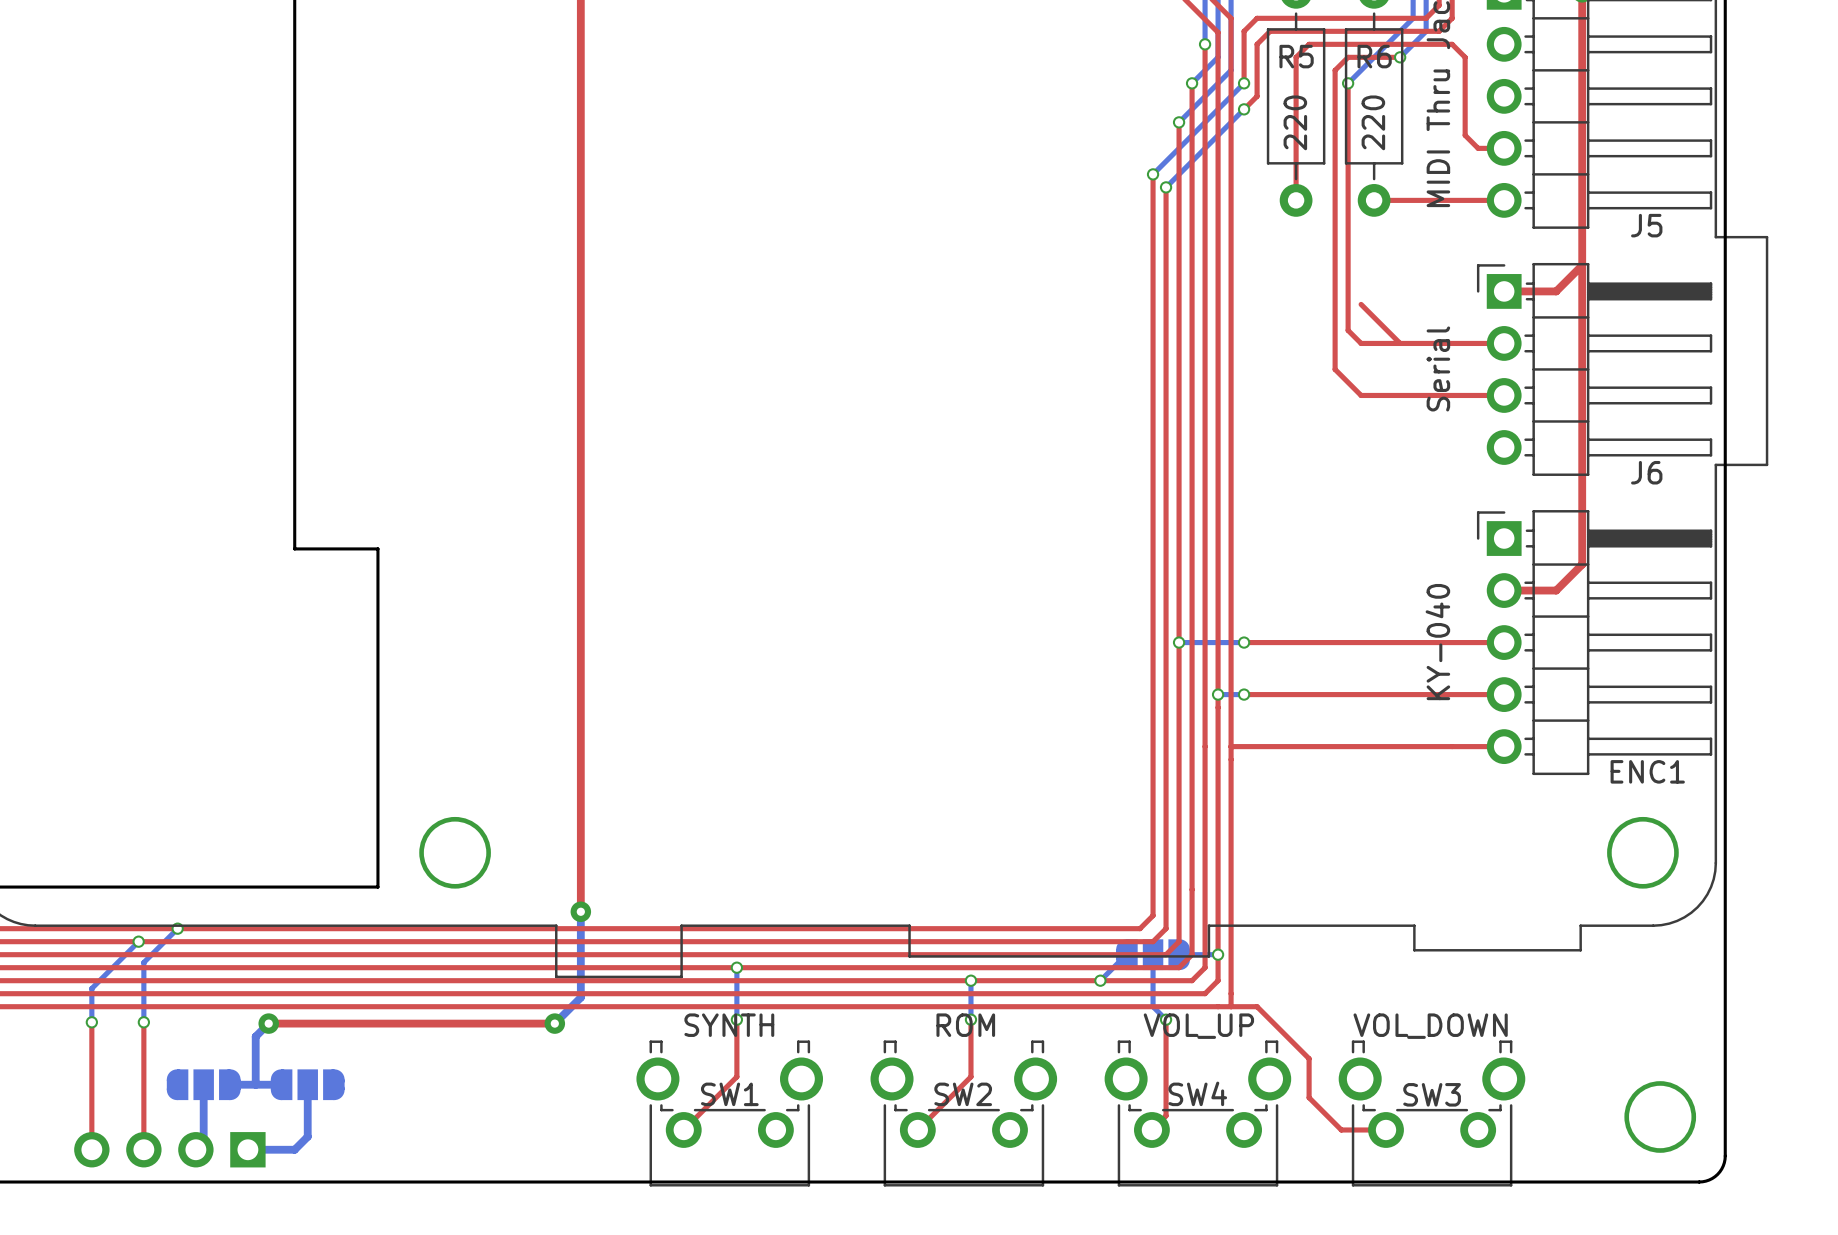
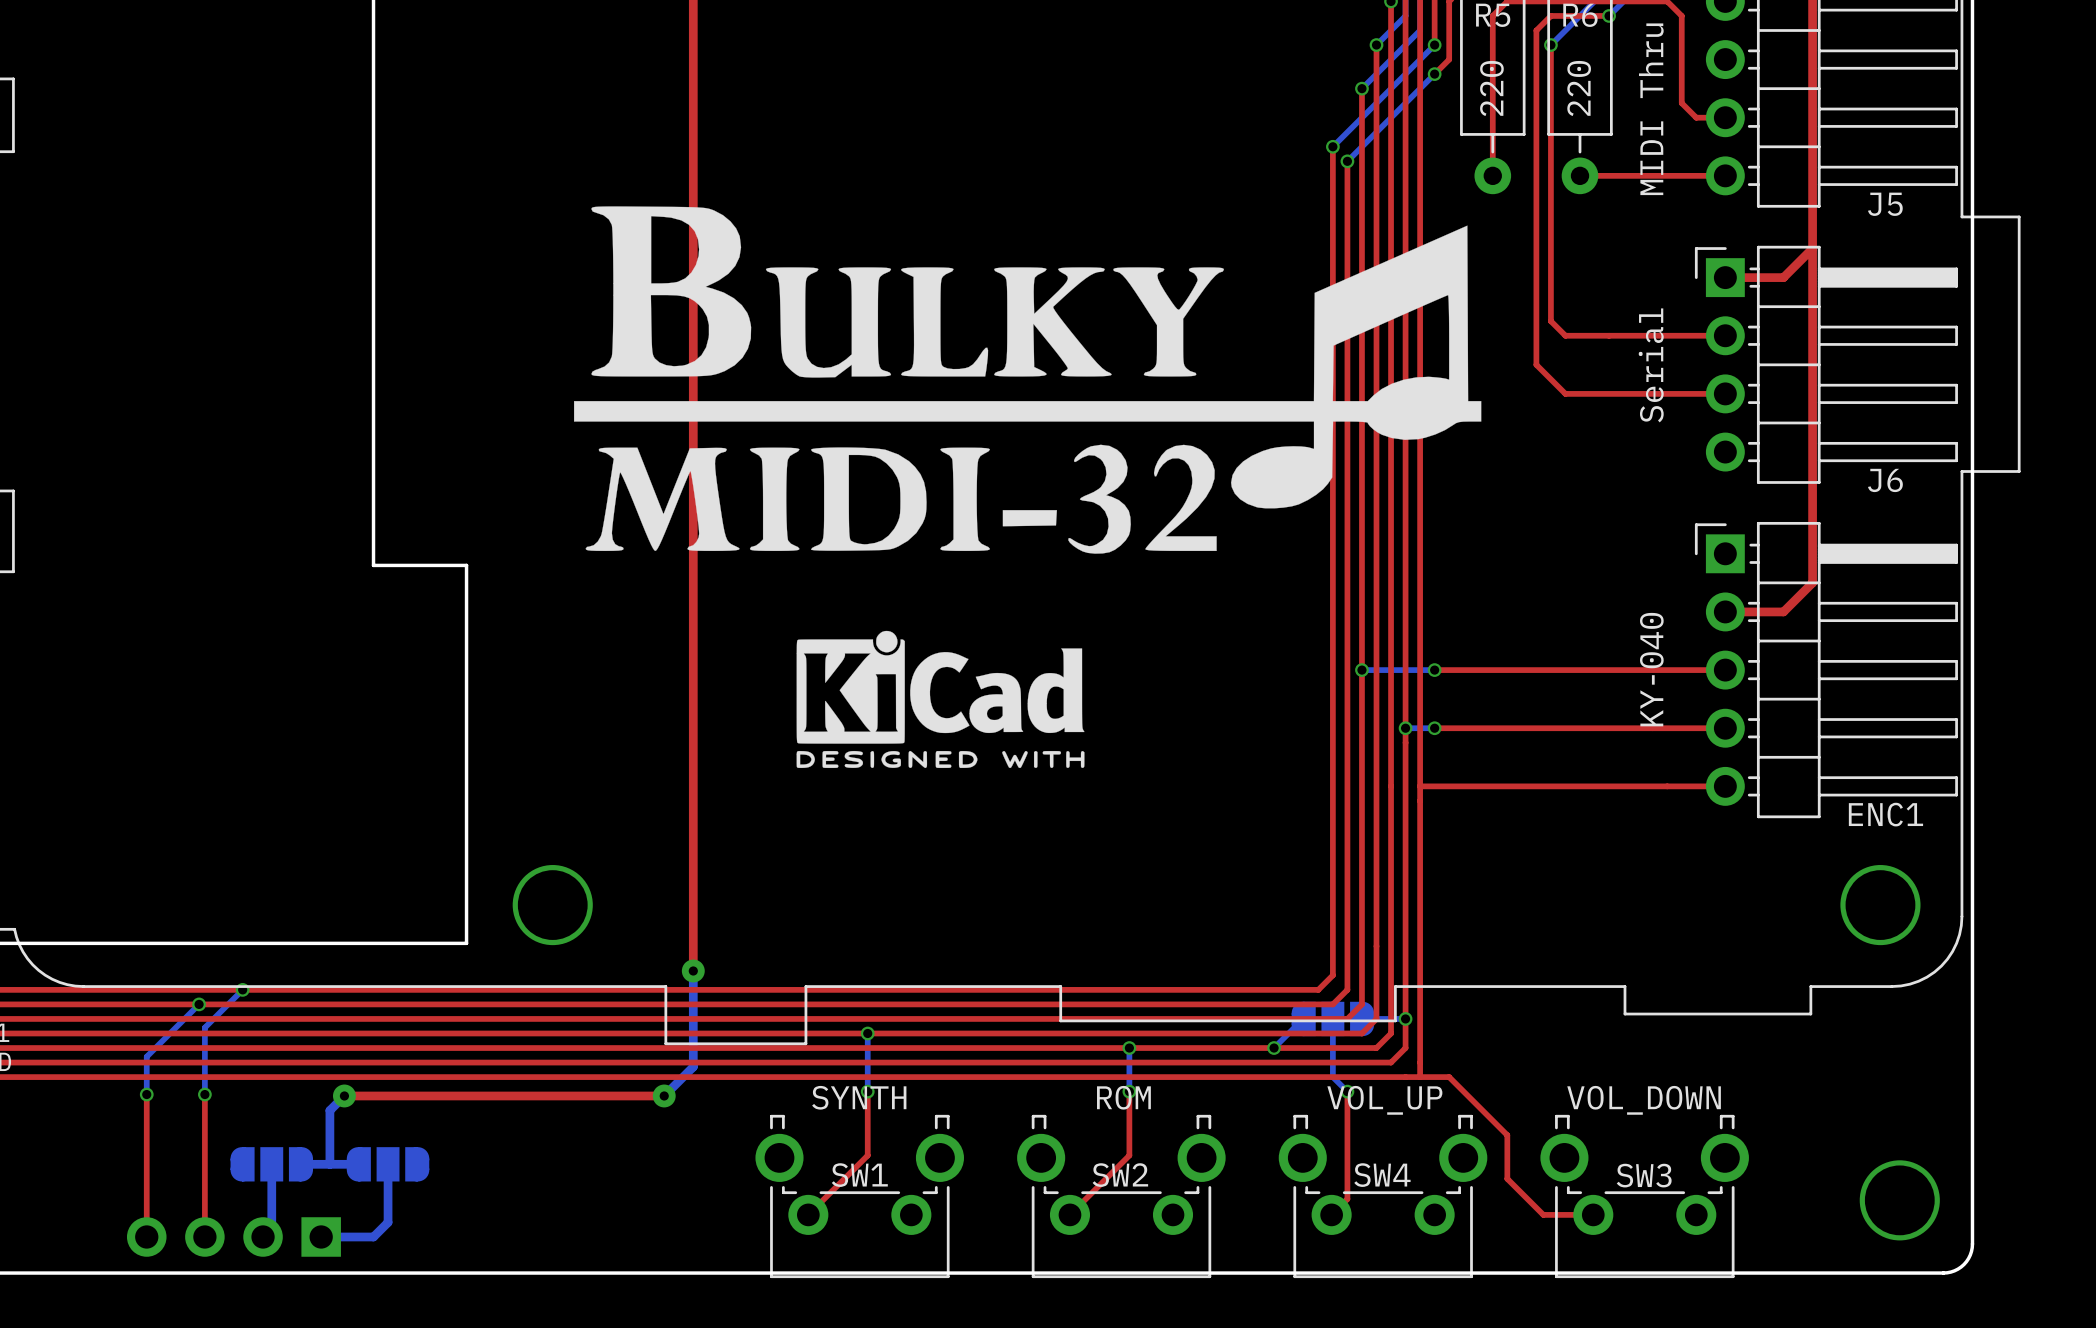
drawing: none -> [573, 206, 1482, 554]
top track: (1361, 304) (1400, 343) -> none
drawing: none -> [796, 630, 1085, 769]

